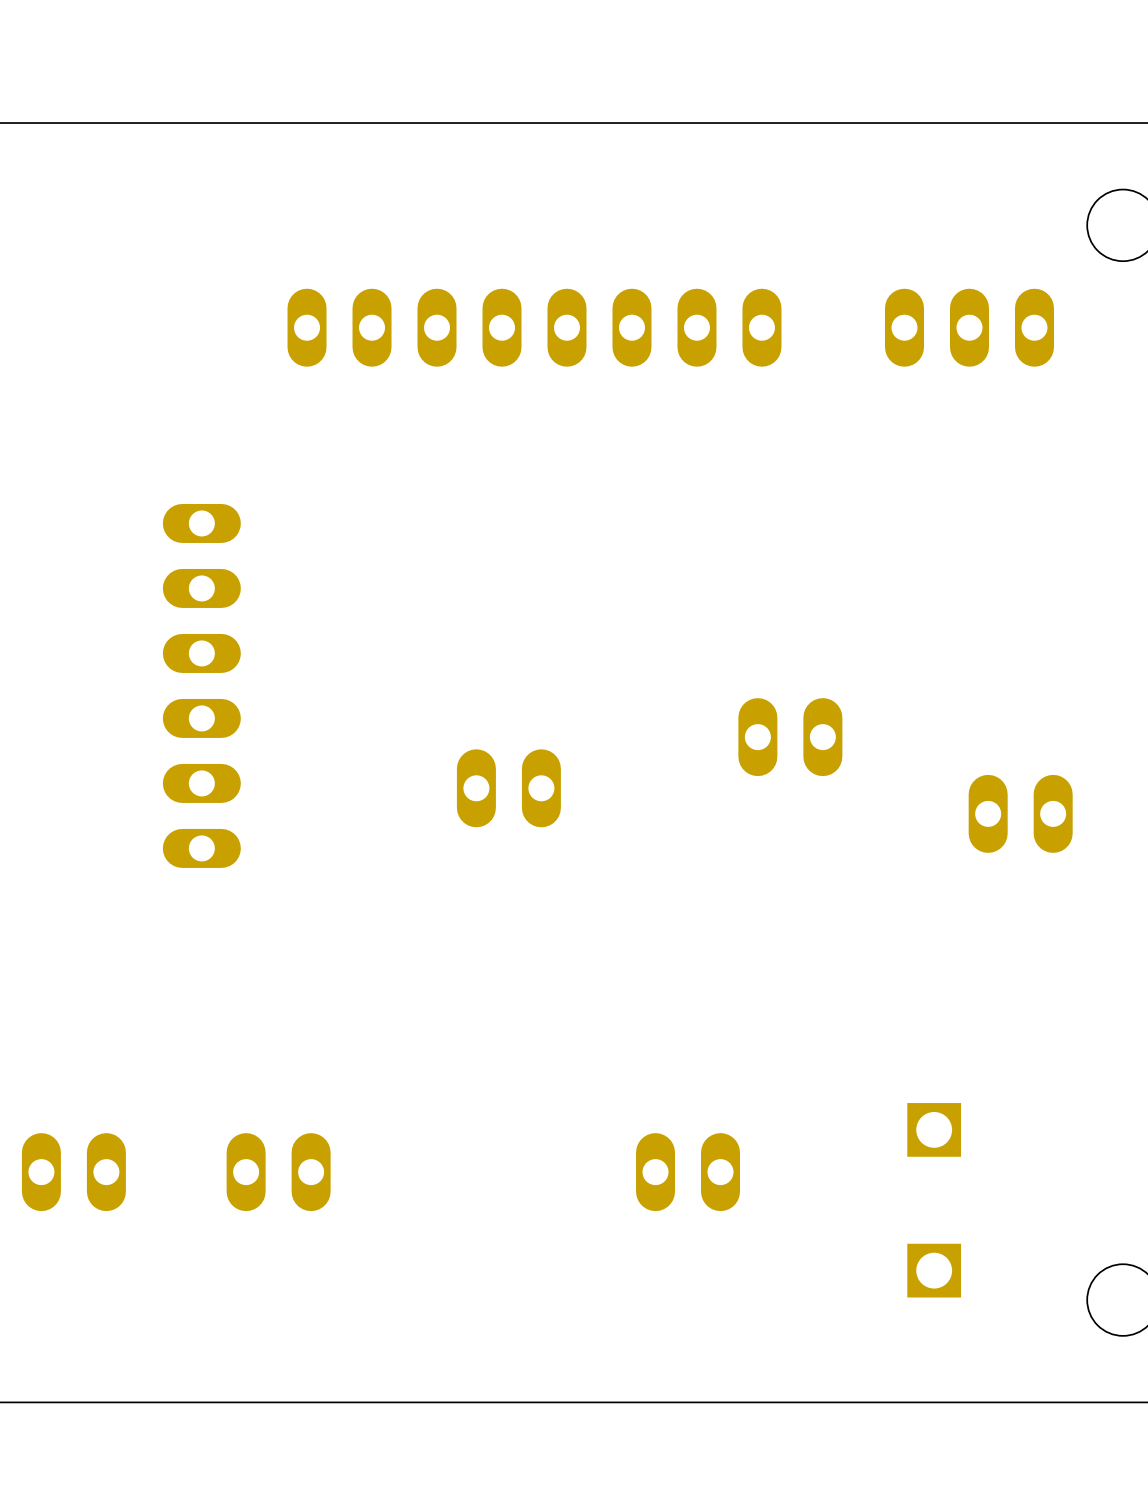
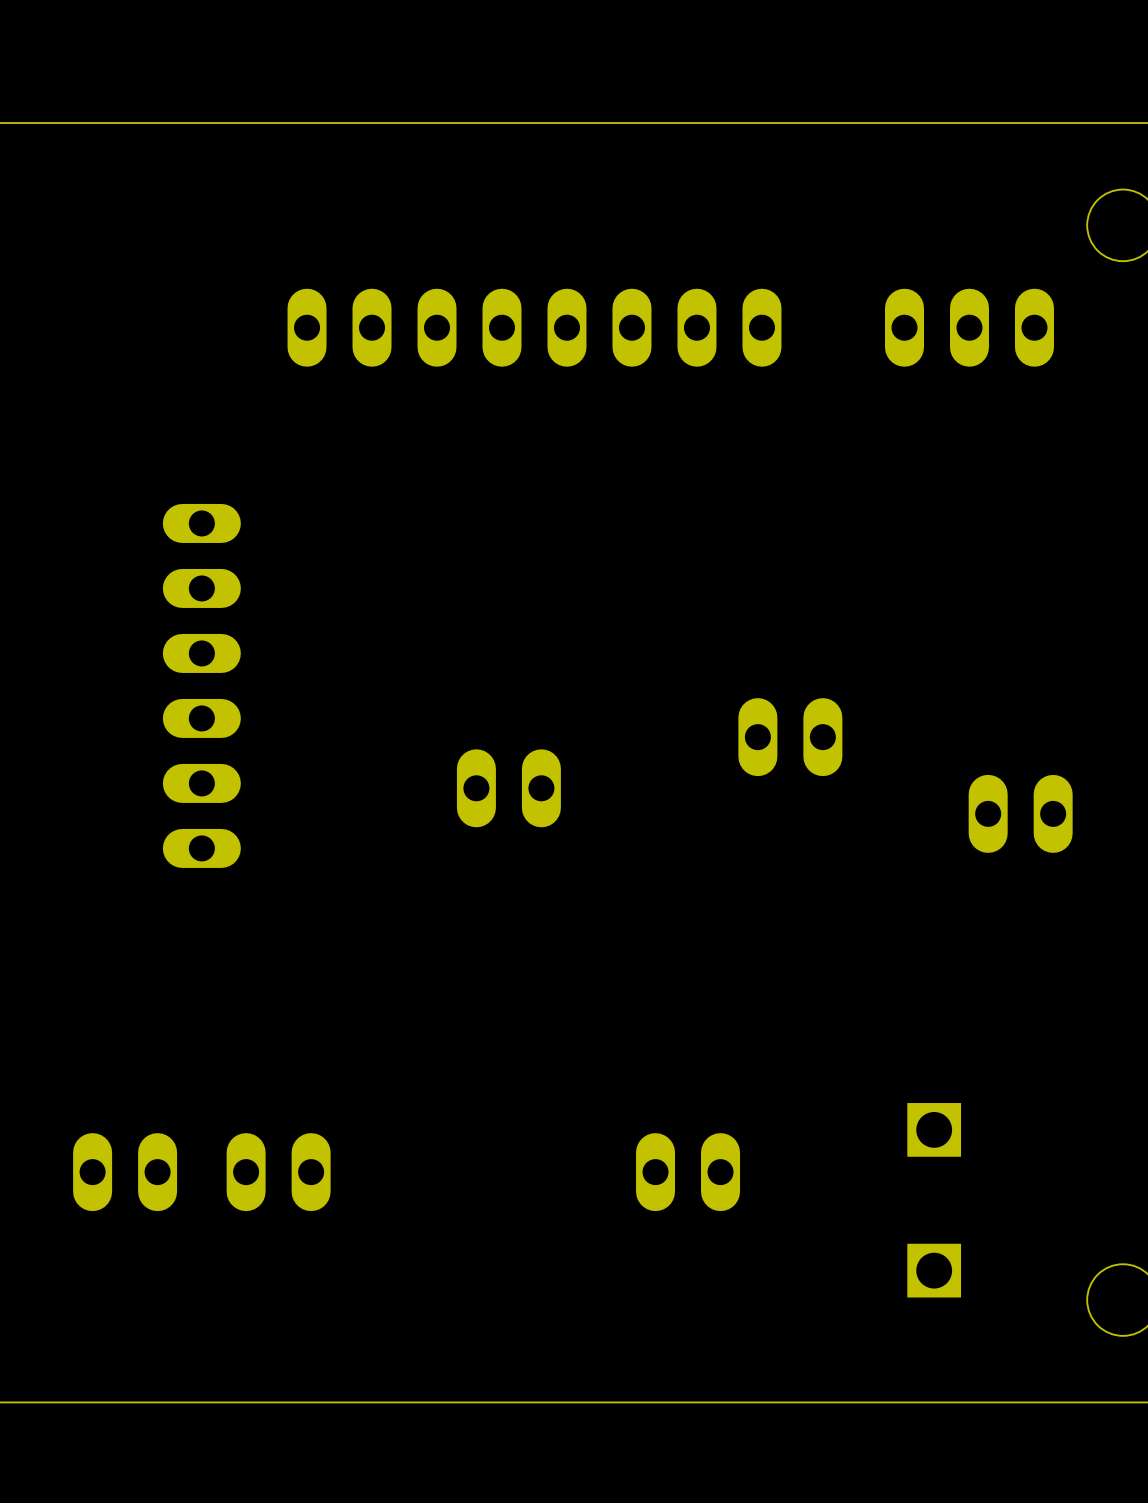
part position: (73, 1172) -> (125, 1172)

